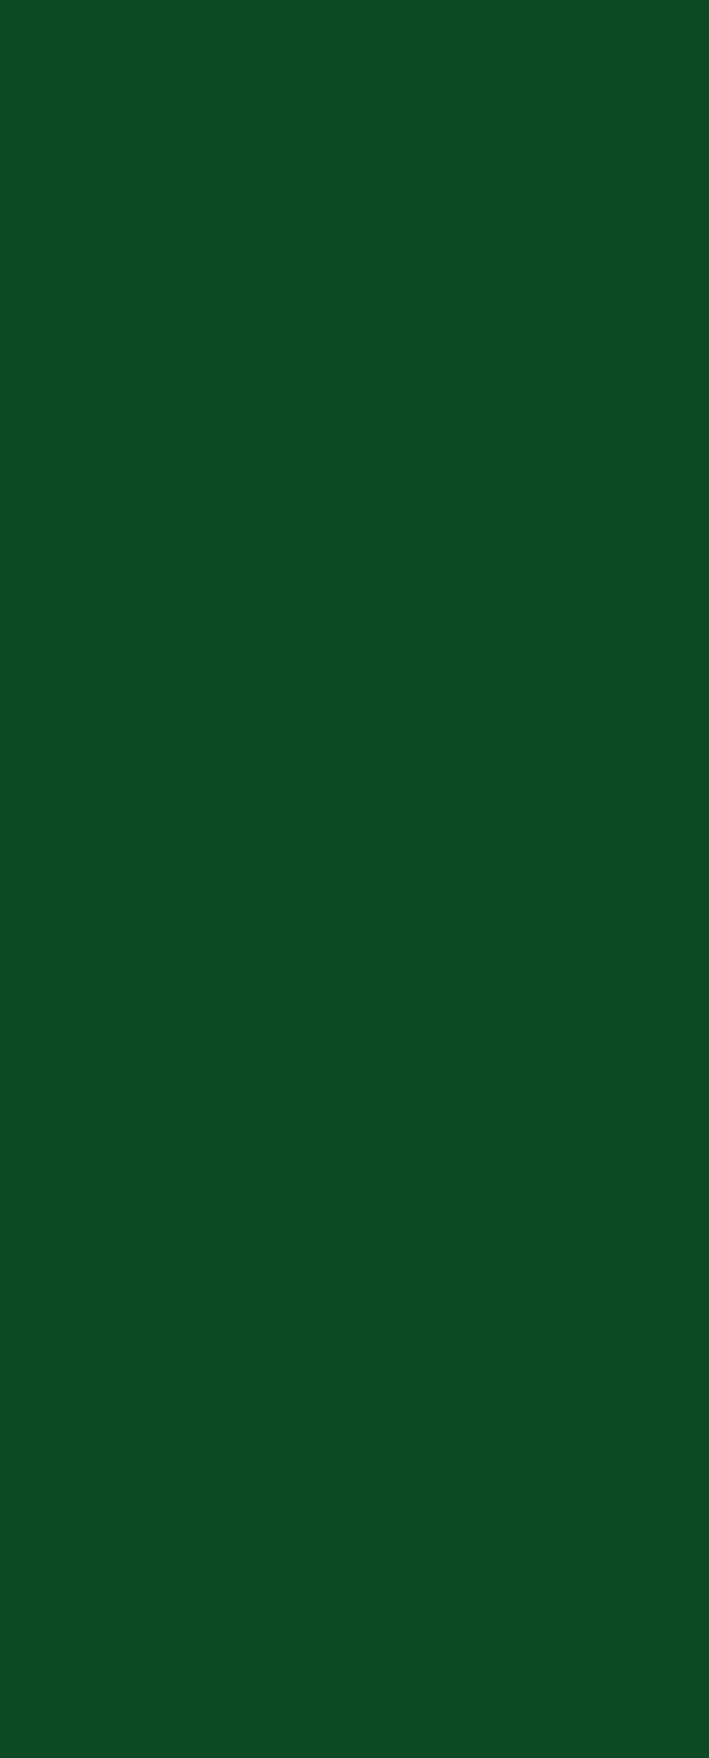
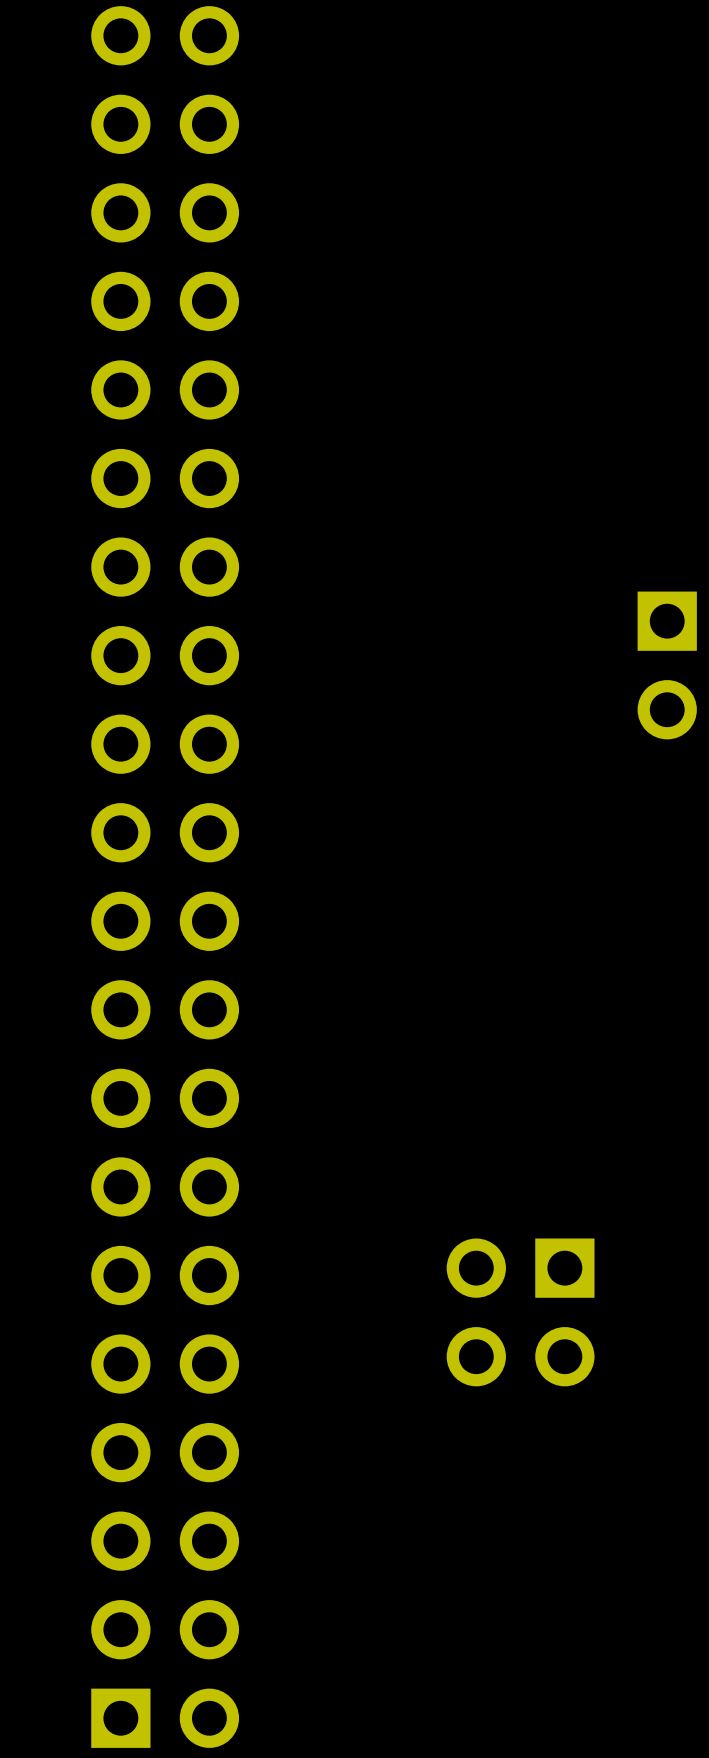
part: none -> (667, 665)
part: none -> (165, 877)
part: none -> (520, 1312)

